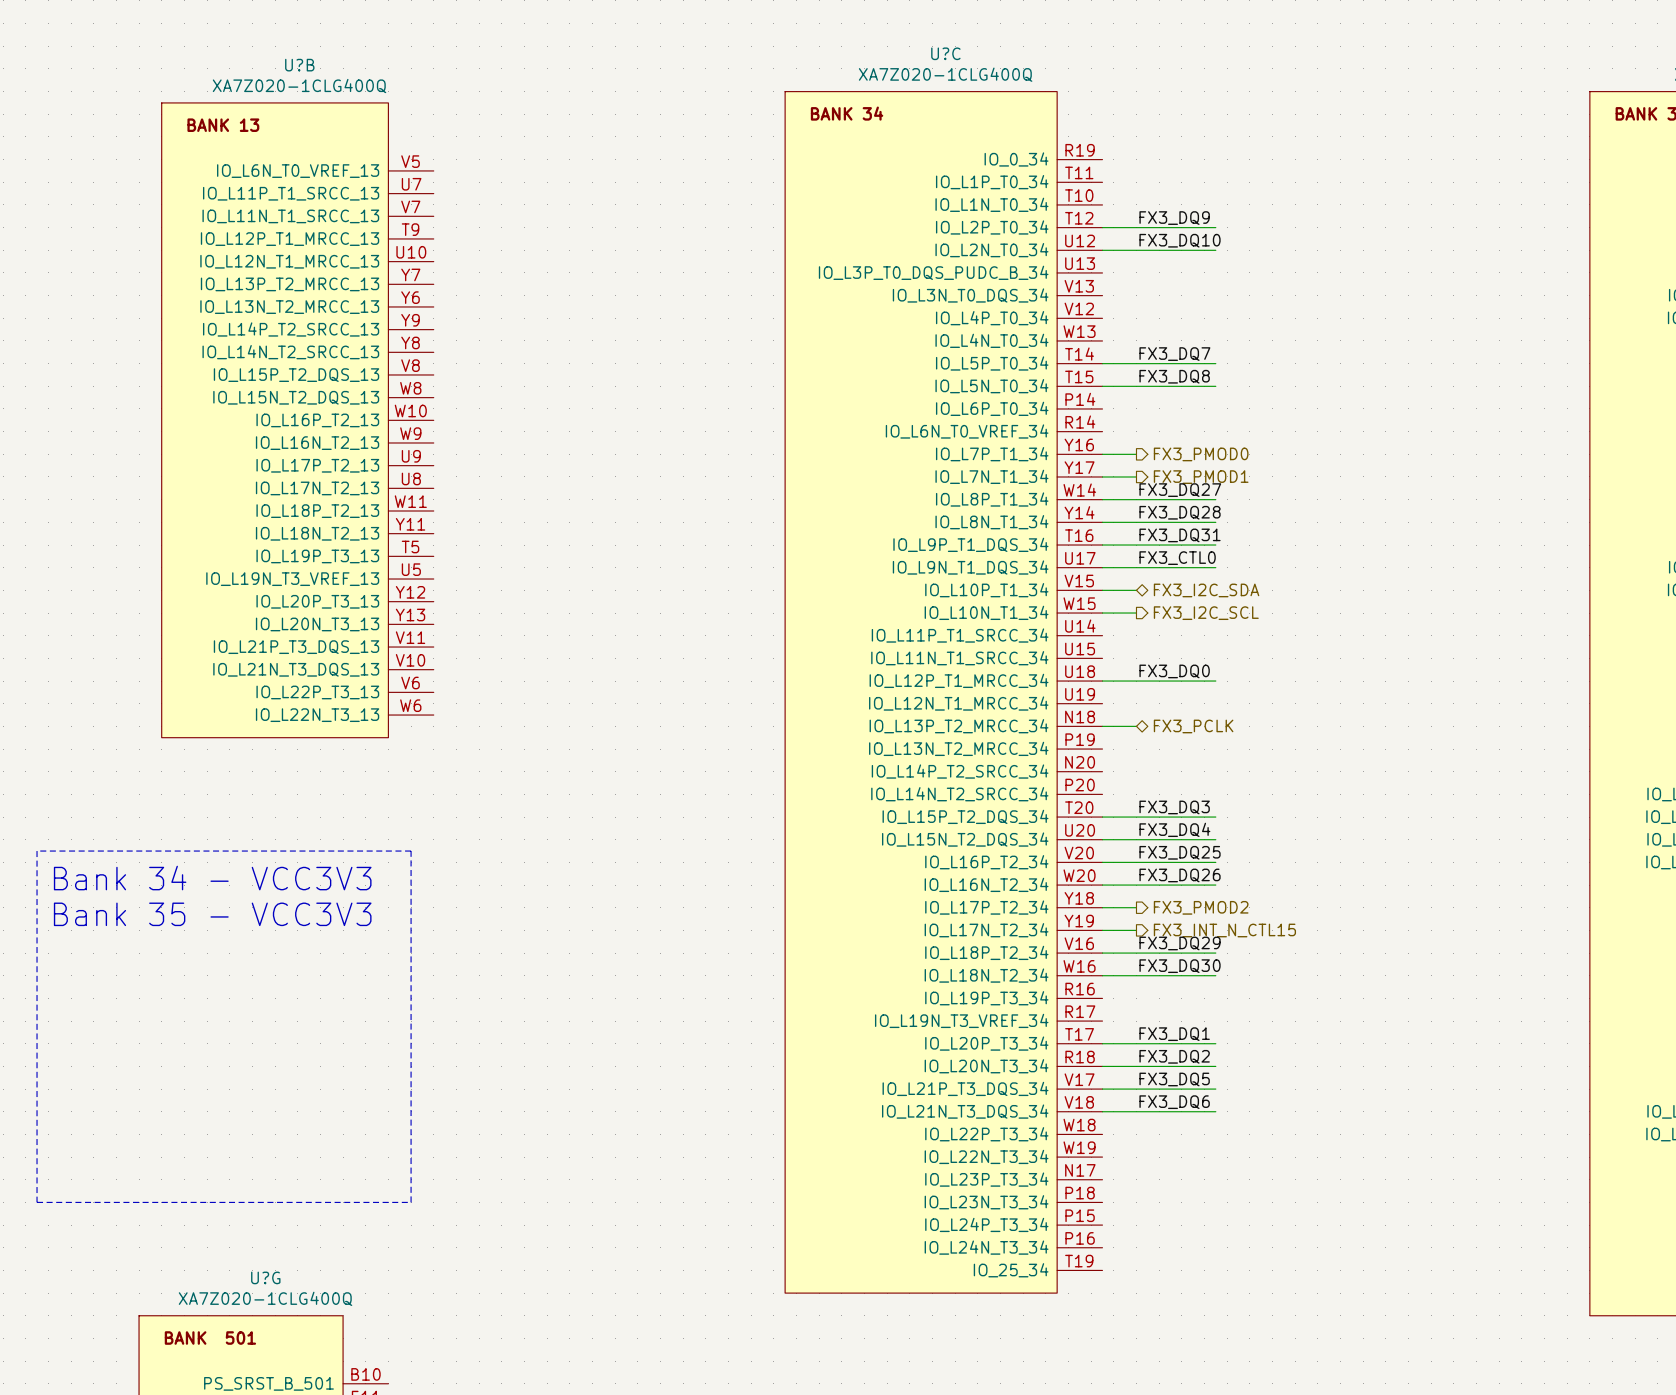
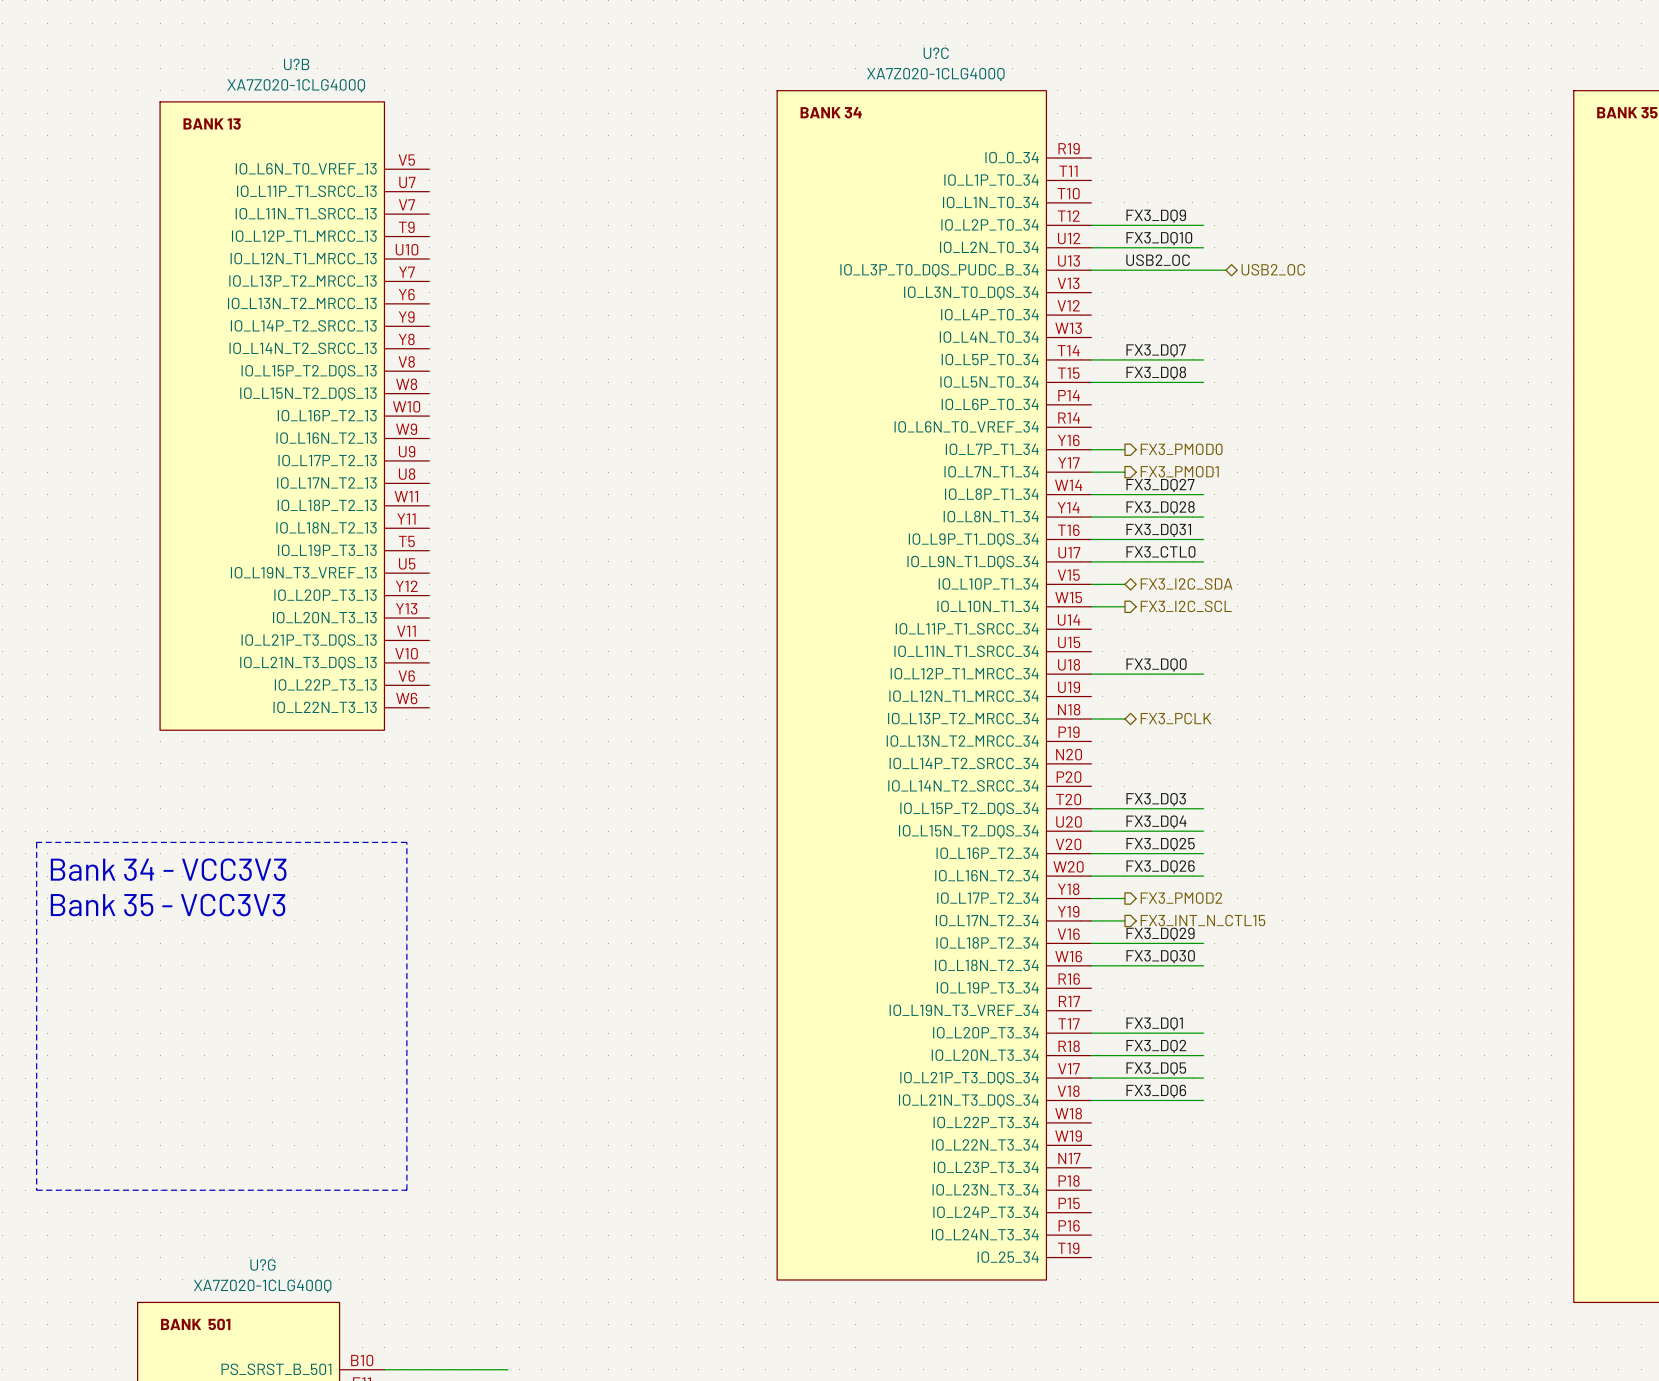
label: none -> USB2_OC (1158, 260)
wire: none -> (1091, 270) (1225, 270)
hierarchical label: none -> USB2_OC (1273, 269)
wire: none -> (384, 1369) (507, 1369)

